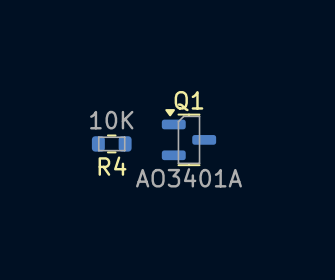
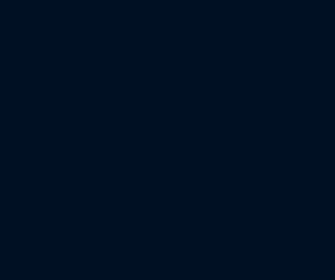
Q1: AO3401A (188, 137) -> none
R4: 10K (111, 143) -> none

